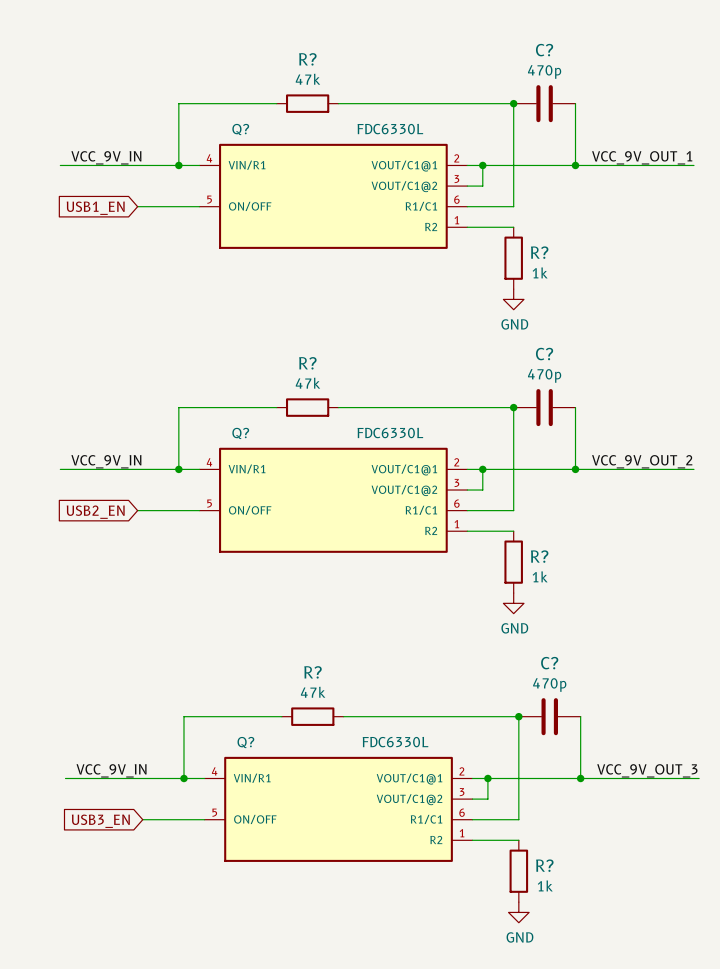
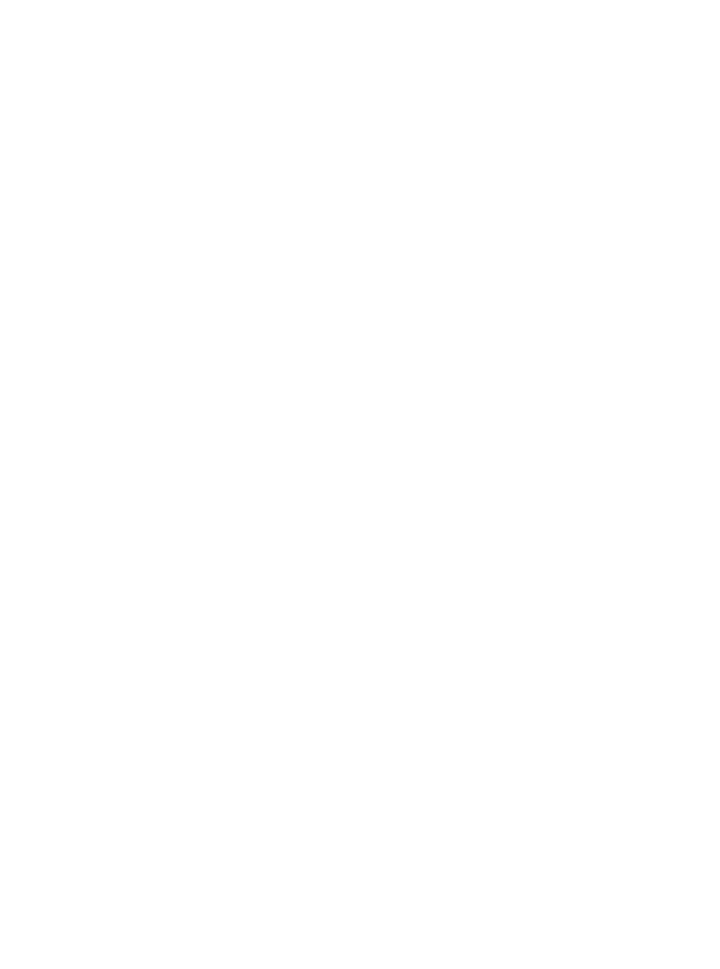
wire: (276, 103) (178, 103) (178, 165) -> none
R?: (307, 103) -> none
wire: (338, 103) (513, 103) (513, 206) (467, 206) -> none
junction: (513, 103) -> none
C?: (544, 103) -> none
wire: (575, 103) (575, 165) -> none
label: VCC_9V_IN (106, 157) -> none
label: VCC_9V_OUT_1 (642, 157) -> none
wire: (60, 165) (199, 165) -> none
junction: (178, 165) -> none
wire: (467, 165) (693, 165) -> none
wire: (482, 165) (482, 186) (467, 186) -> none
junction: (482, 165) -> none
junction: (575, 165) -> none
Q?: FDC6330L (333, 196) -> none
wire: (137, 206) (199, 206) -> none
global label: USB1_EN (95, 208) -> none
wire: (467, 227) (513, 227) -> none
R?: (513, 258) -> none
power symbol: GND (513, 299) -> none
wire: (276, 407) (178, 407) (178, 469) -> none
R?: (307, 407) -> none
wire: (338, 407) (513, 407) (513, 510) (467, 510) -> none
junction: (513, 407) -> none
C?: (544, 407) -> none
wire: (575, 407) (575, 469) -> none
label: VCC_9V_IN (106, 461) -> none
label: VCC_9V_OUT_2 (642, 461) -> none
wire: (60, 469) (199, 469) -> none
junction: (178, 469) -> none
wire: (467, 469) (693, 469) -> none
wire: (482, 469) (482, 490) (467, 490) -> none
junction: (482, 469) -> none
junction: (575, 469) -> none
Q?: FDC6330L (333, 500) -> none
wire: (137, 510) (199, 510) -> none
global label: USB2_EN (95, 512) -> none
wire: (467, 531) (513, 531) -> none
R?: (513, 562) -> none
power symbol: GND (513, 603) -> none
wire: (281, 716) (183, 716) (183, 778) -> none
R?: (312, 716) -> none
wire: (343, 716) (518, 716) (518, 819) (472, 819) -> none
junction: (518, 716) -> none
C?: (549, 716) -> none
wire: (580, 716) (580, 778) -> none
label: VCC_9V_IN (111, 770) -> none
label: VCC_9V_OUT_3 (647, 770) -> none
wire: (65, 778) (204, 778) -> none
junction: (183, 778) -> none
wire: (472, 778) (699, 778) -> none
wire: (487, 778) (487, 799) (472, 799) -> none
junction: (487, 778) -> none
junction: (580, 778) -> none
Q?: FDC6330L (338, 809) -> none
wire: (142, 819) (204, 819) -> none
global label: USB3_EN (100, 821) -> none
wire: (472, 840) (518, 840) -> none
R?: (518, 871) -> none
power symbol: GND (518, 912) -> none

